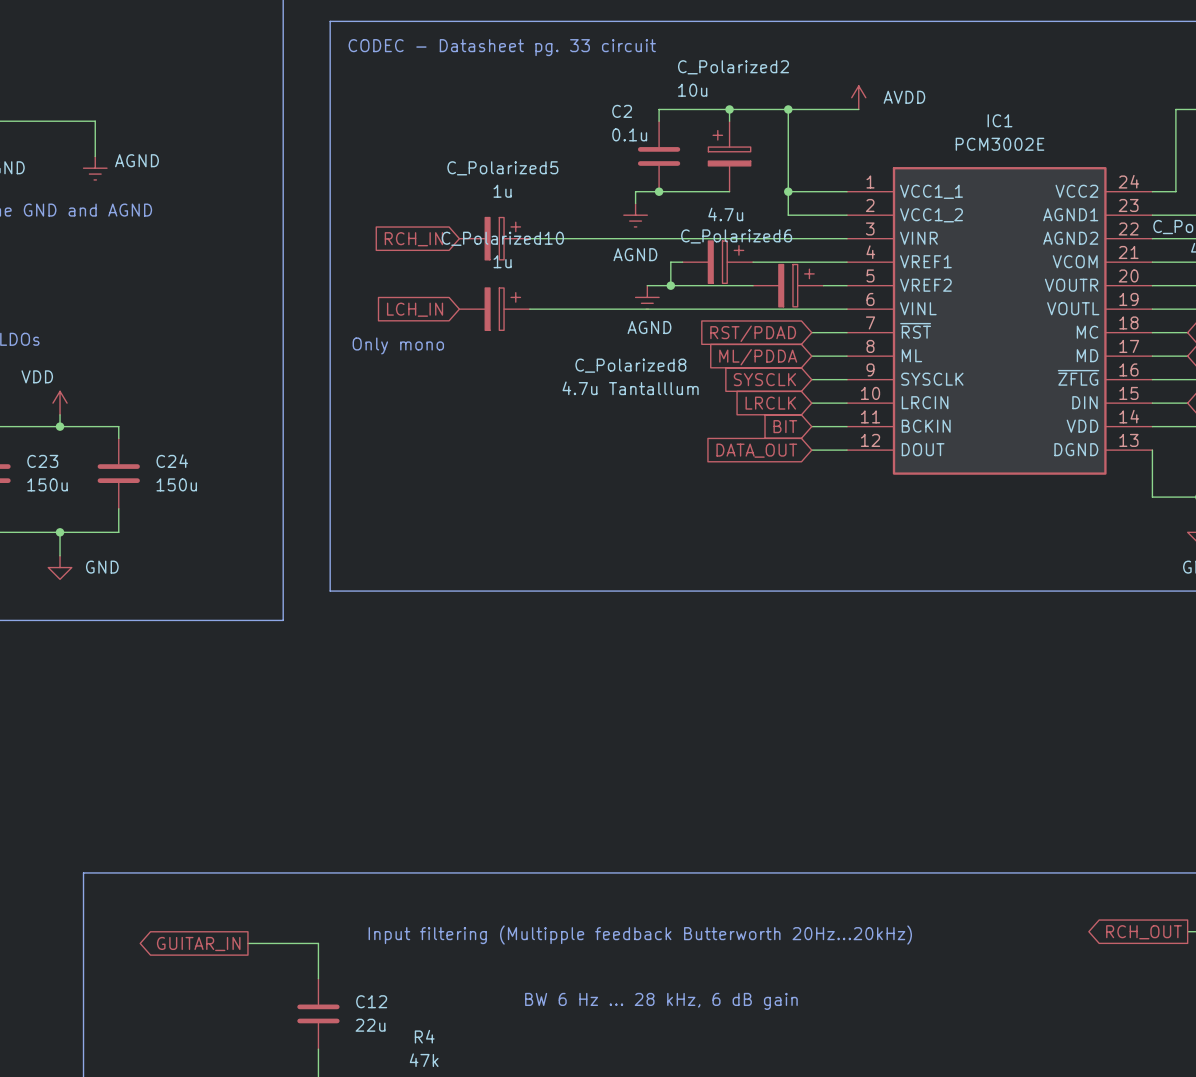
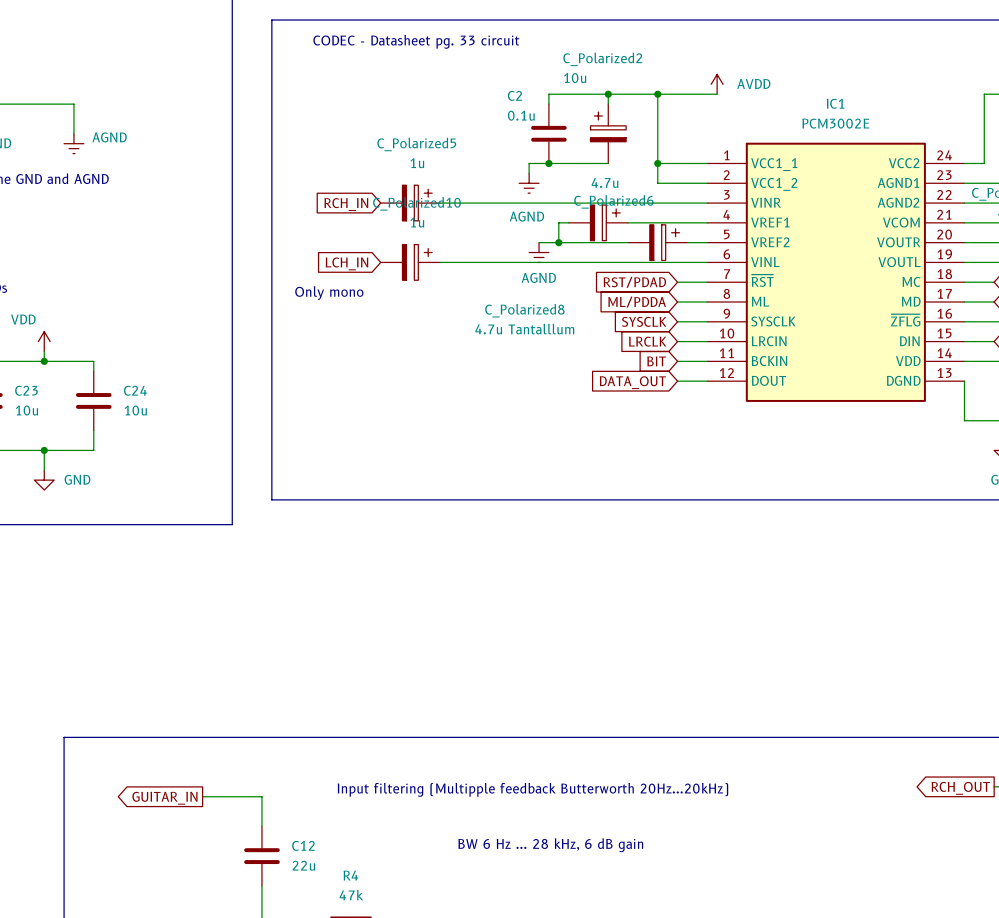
C23 value: 150u (47, 484) -> 10u (26, 410)
C24 value: 150u (176, 484) -> 10u (135, 410)

